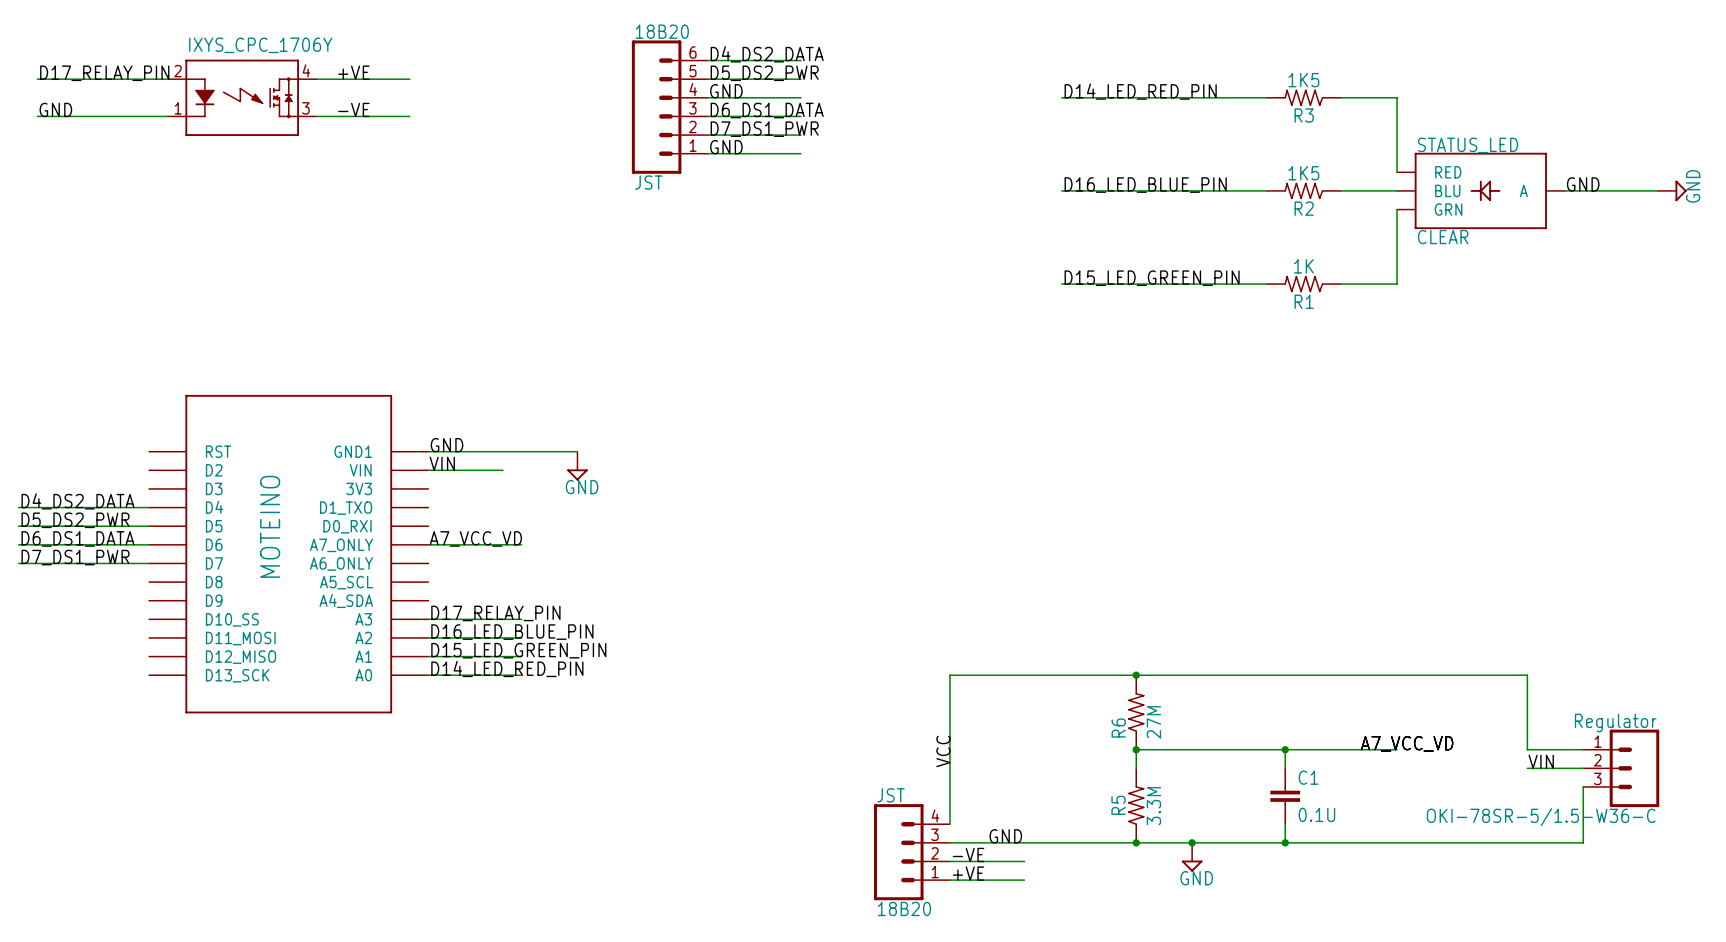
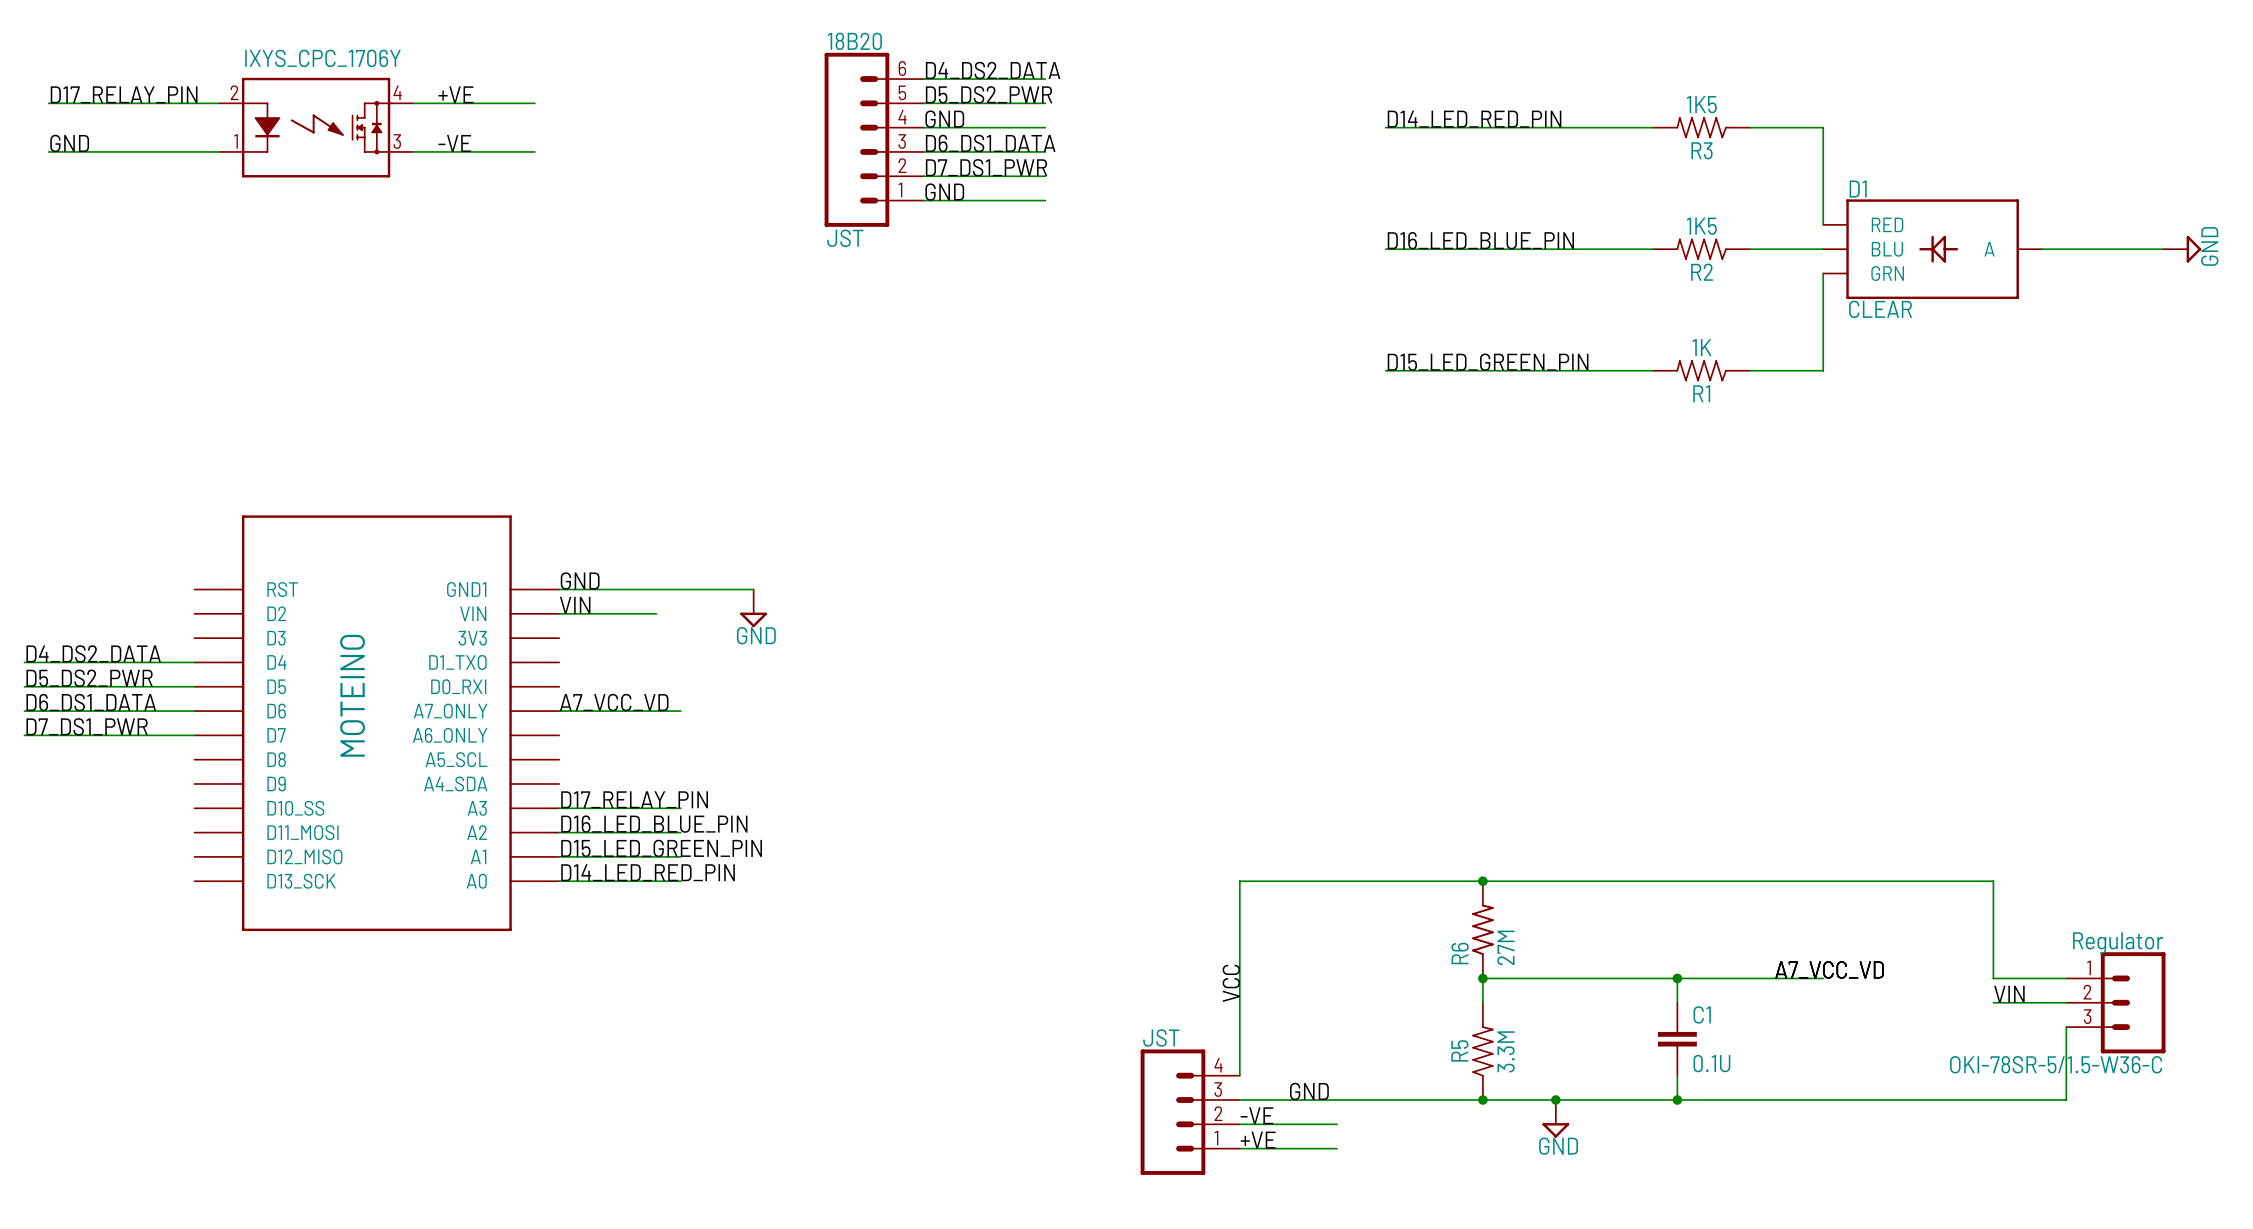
STATUS_LED name: STATUS_LED (1468, 145) -> D1 (1858, 189)
label: GND (1583, 184) -> none
JST value: 18B20 (904, 908) -> none

